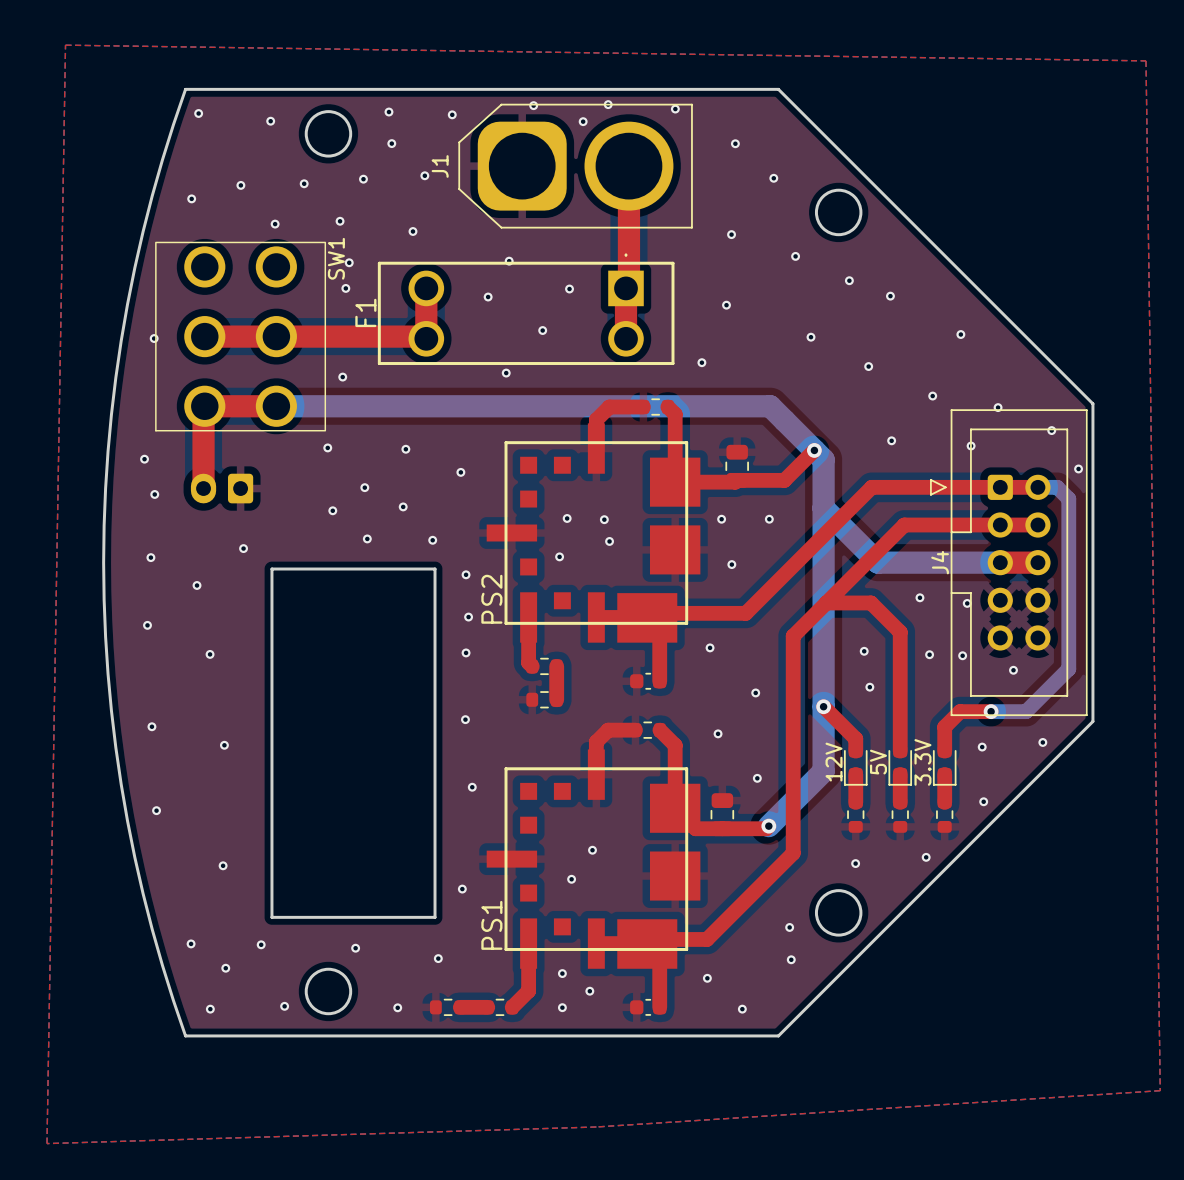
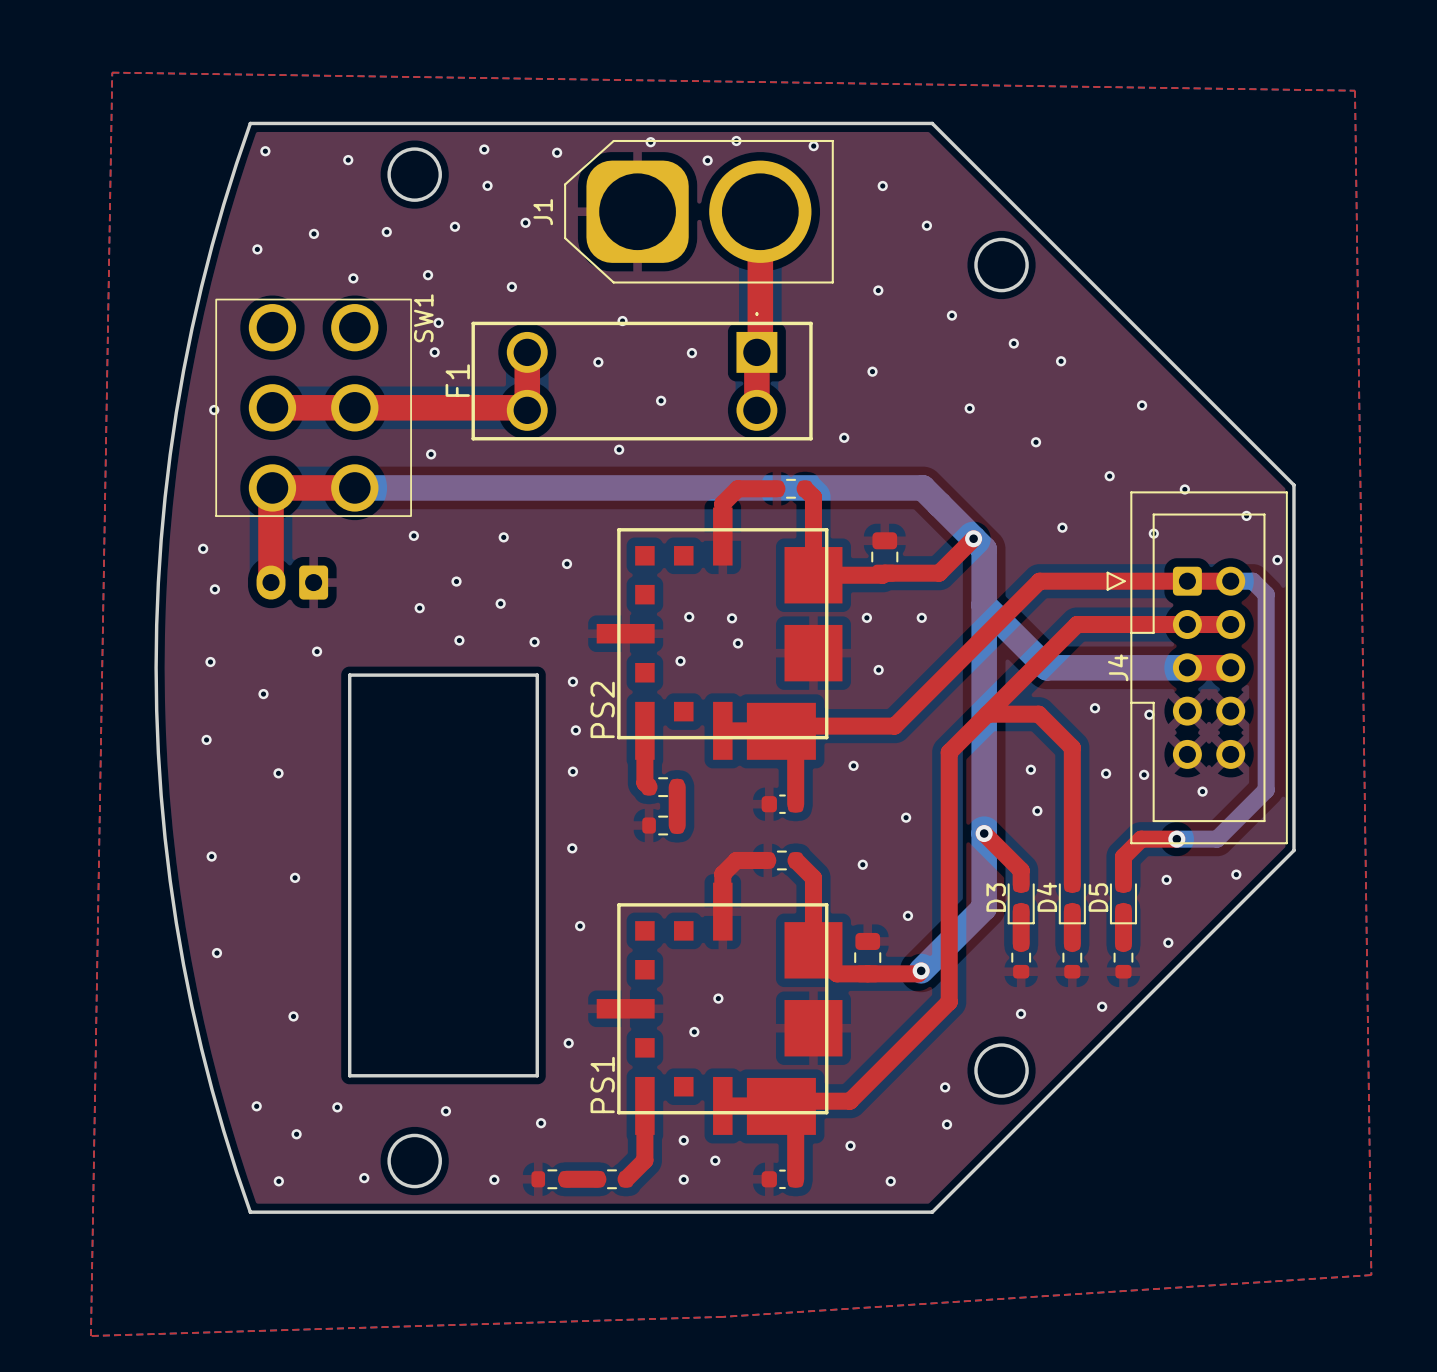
12V name: 12V (834, 762) -> D3 (996, 897)
5V name: 5V (878, 762) -> D4 (1046, 897)
3.3V name: 3.3V (922, 762) -> D5 (1098, 897)

